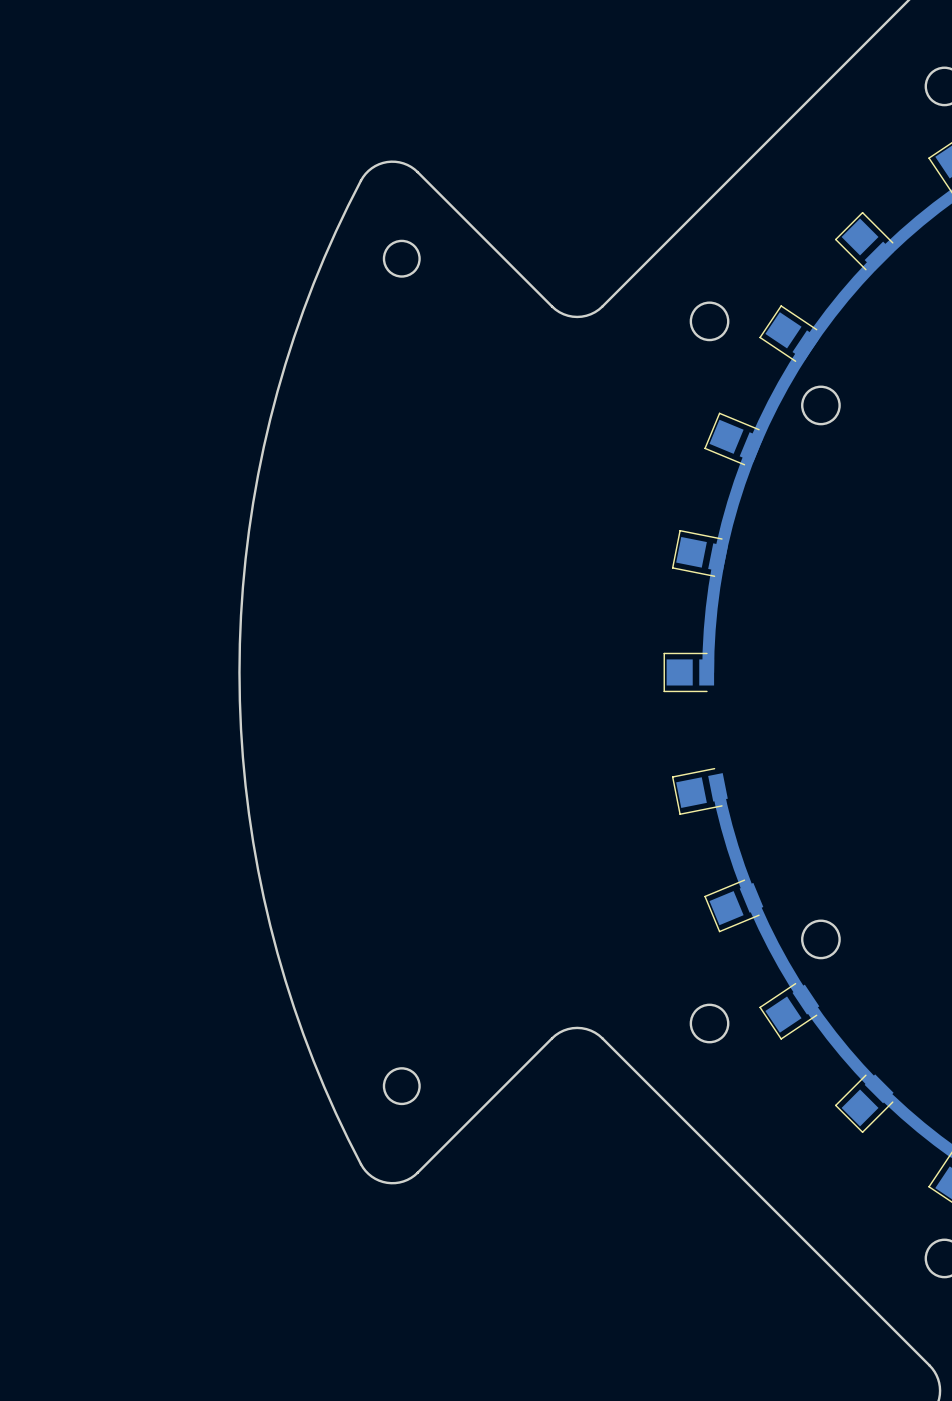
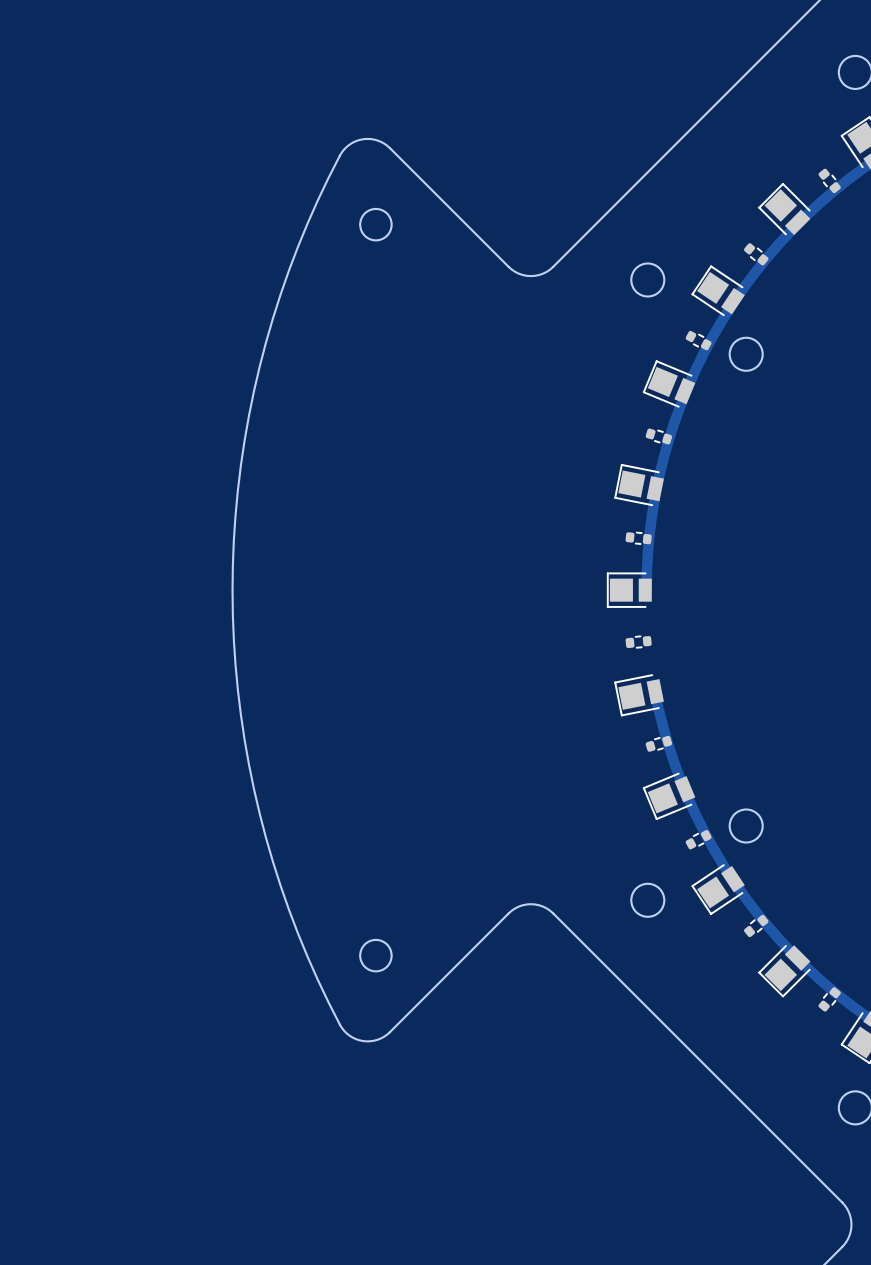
part: none -> (829, 180)
part: none -> (756, 254)
part: none -> (698, 340)
part: none -> (658, 436)
part: none -> (638, 538)
part: none -> (638, 642)
part: none -> (658, 743)
part: none -> (698, 839)
part: none -> (756, 926)
part: none -> (829, 999)

